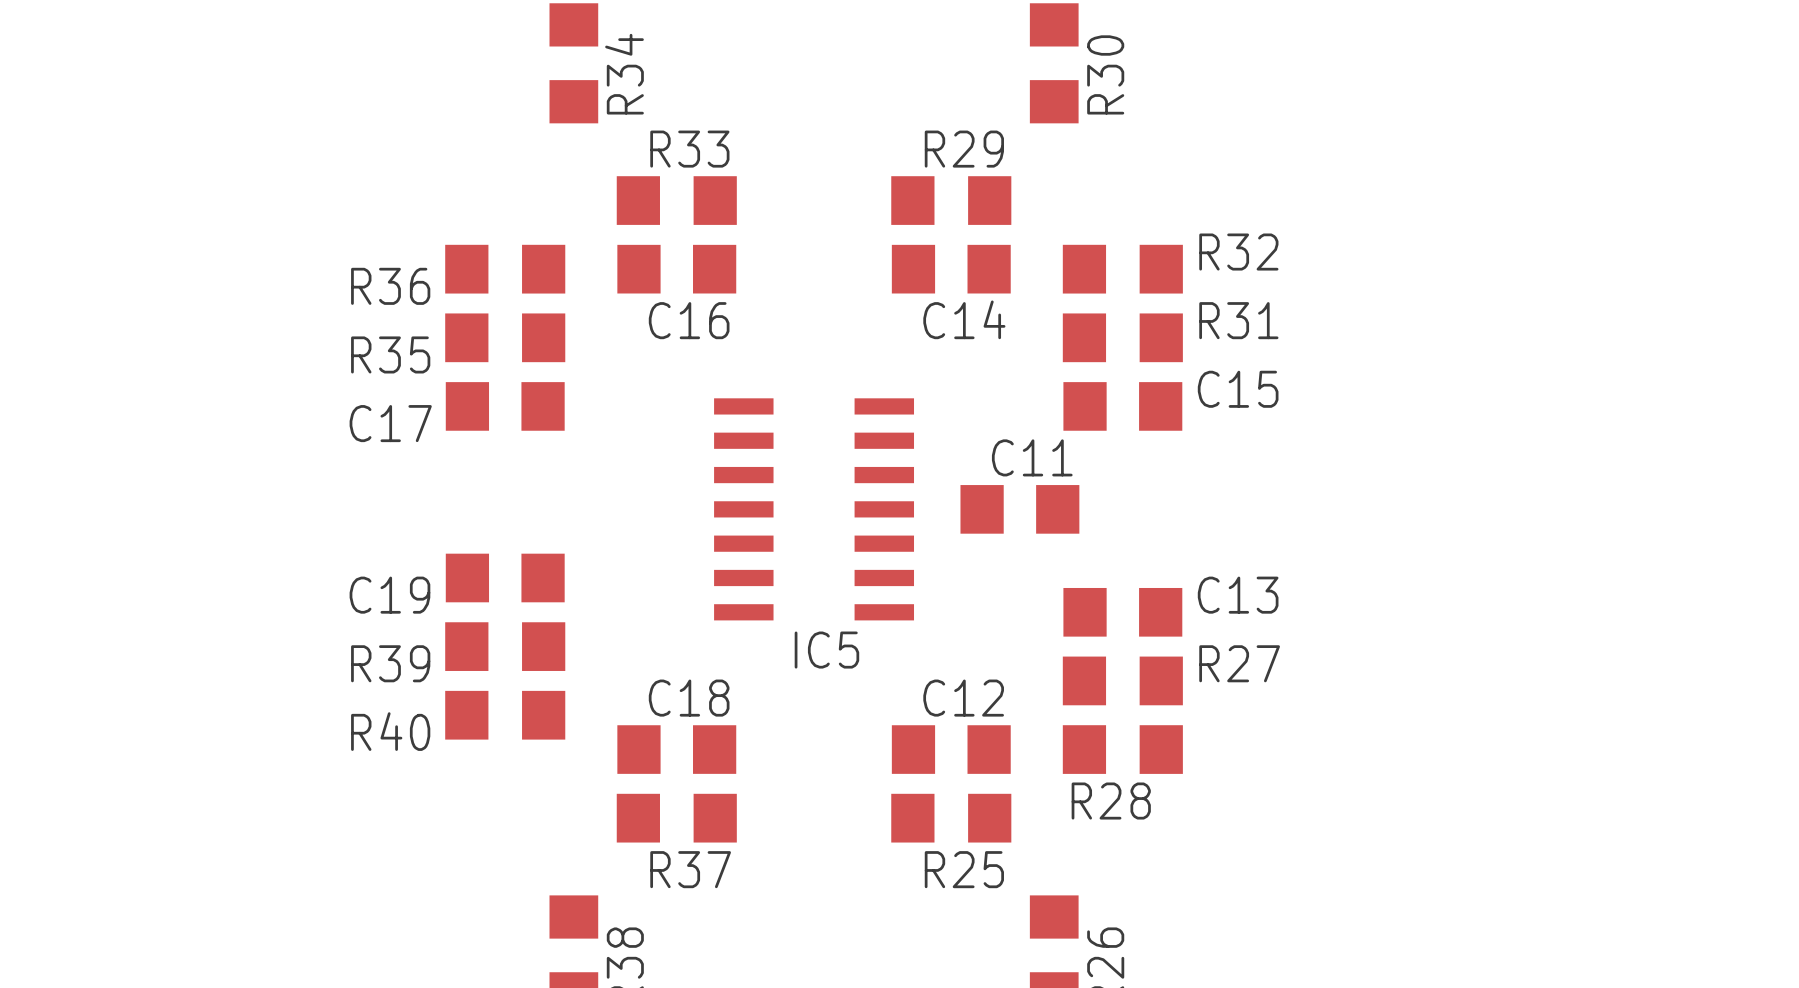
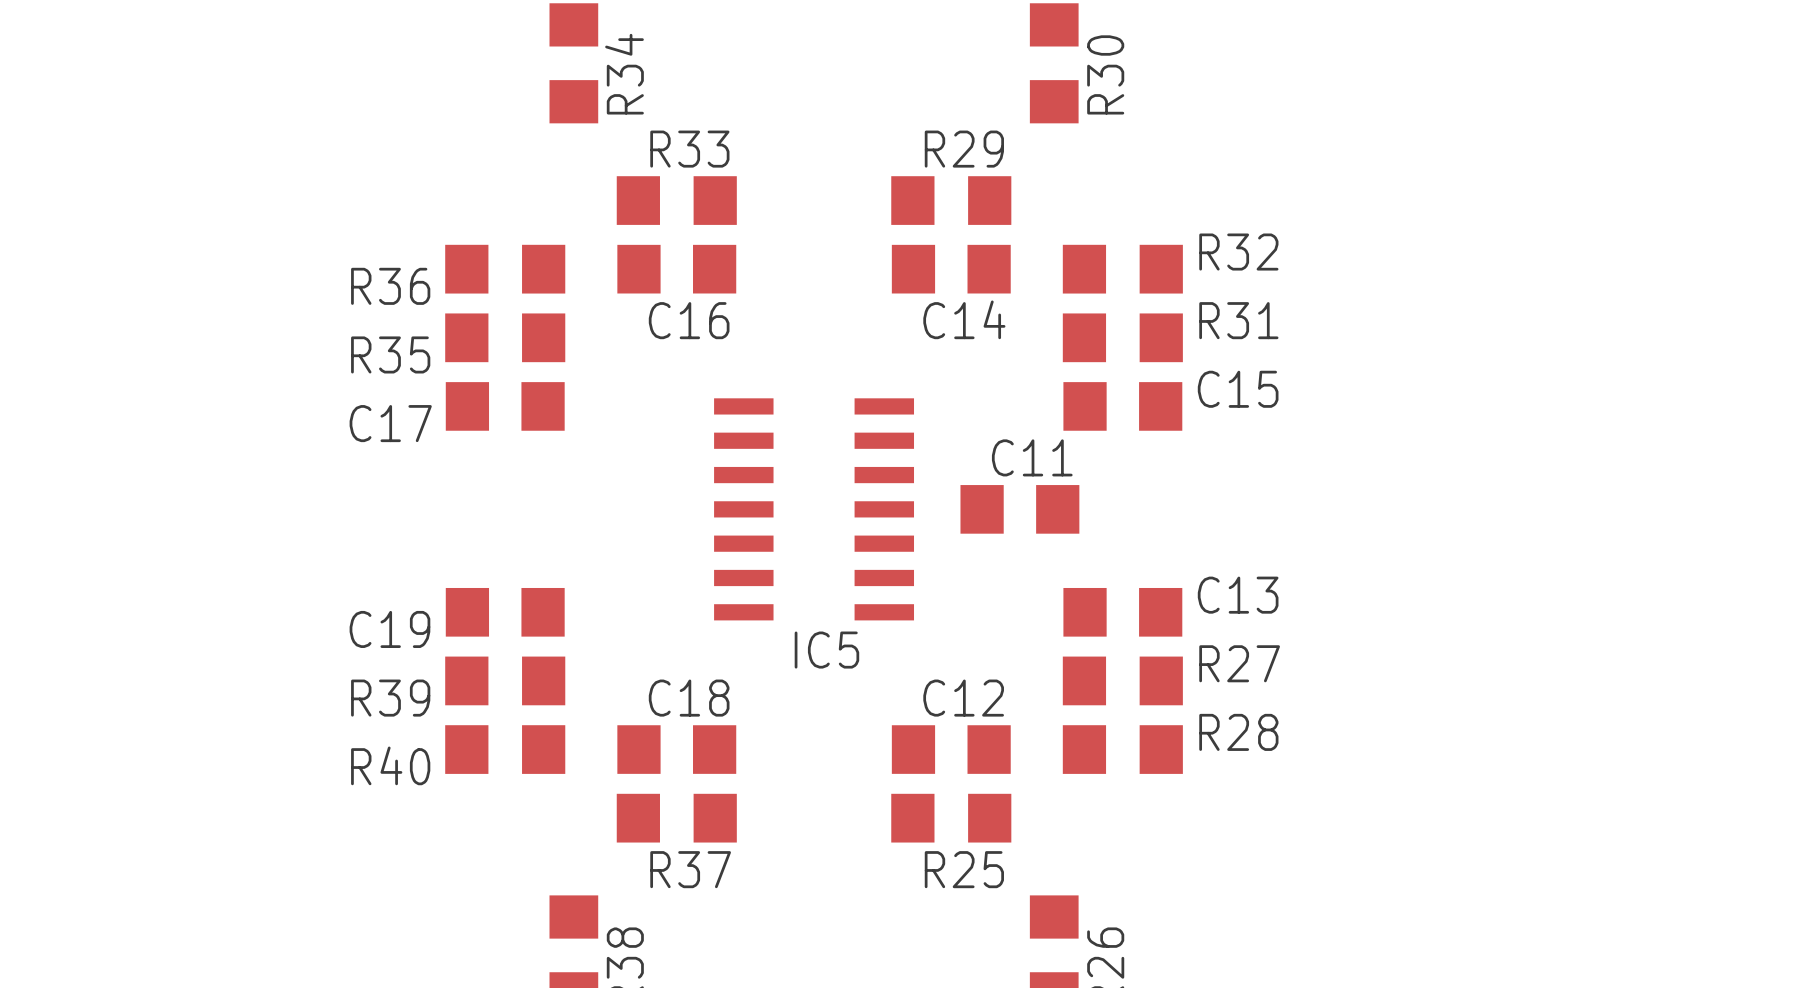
C19 position: (505, 577) -> (505, 612)
R39 position: (505, 646) -> (505, 680)
R40 position: (505, 715) -> (505, 749)
R28 name position: R28 (1111, 801) -> R28 (1238, 732)

